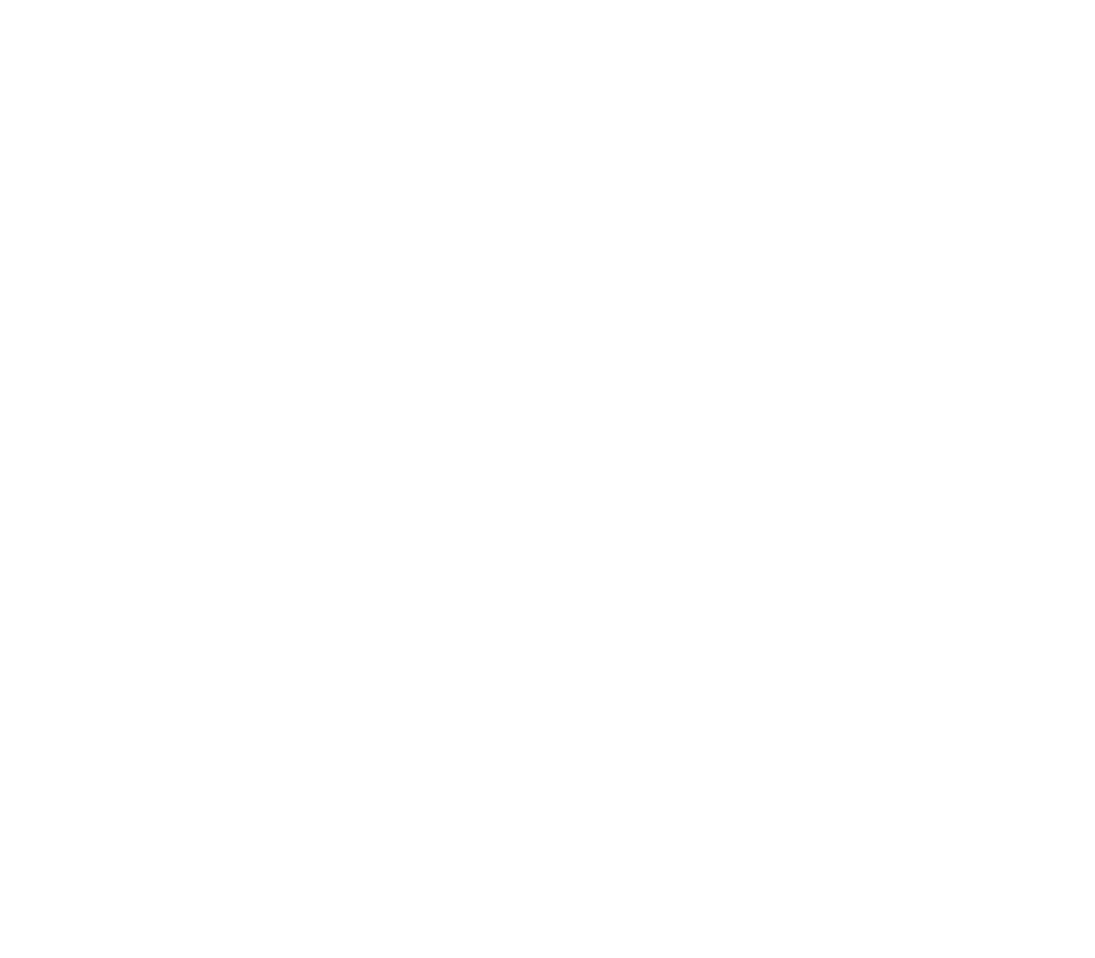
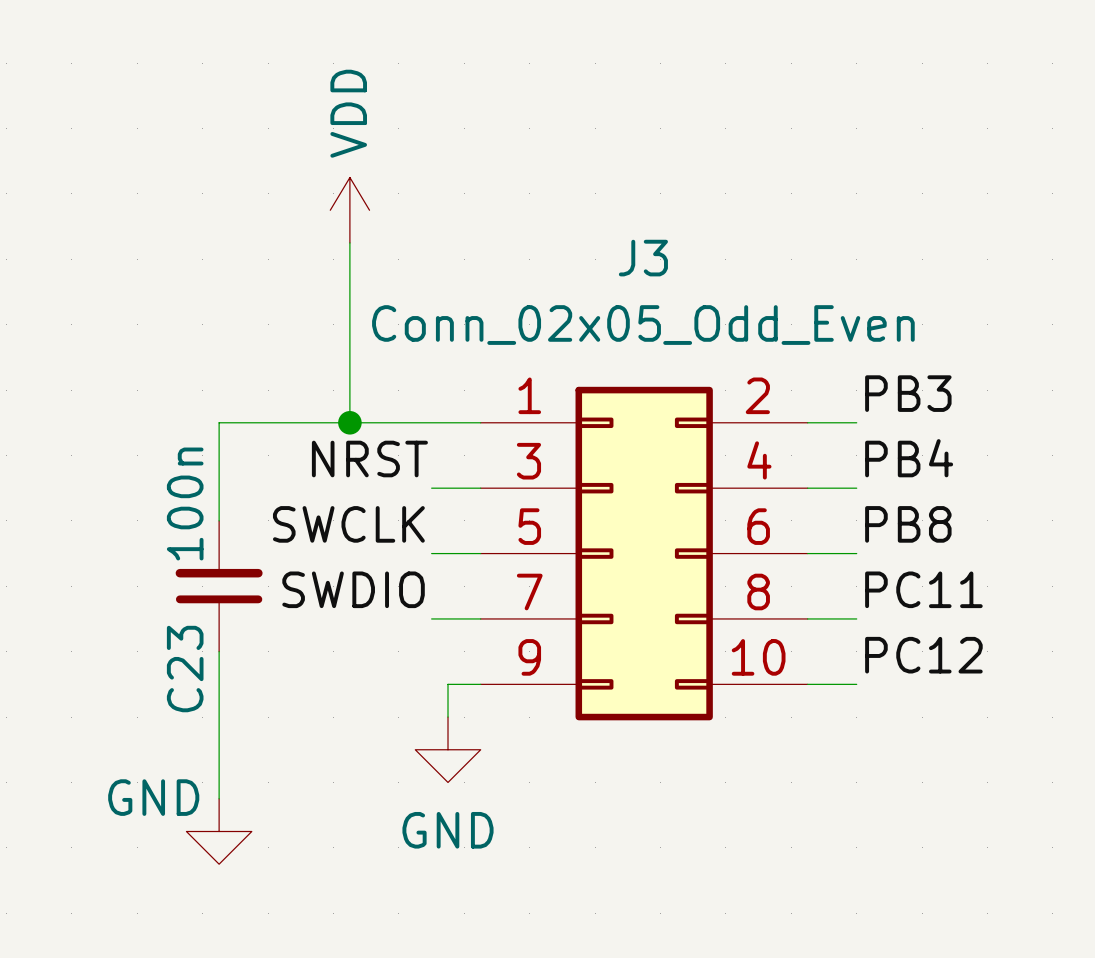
power symbol: none -> VDD (349, 210)
wire: none -> (349, 242) (349, 422)
label: none -> PB3 (908, 393)
junction: none -> (349, 422)
wire: none -> (480, 422) (219, 422) (219, 520)
wire: none -> (807, 422) (856, 422)
label: none -> NRST (369, 459)
label: none -> PB4 (909, 458)
wire: none -> (431, 488) (480, 488)
wire: none -> (807, 488) (856, 488)
label: none -> SWCLK (348, 524)
label: none -> PB8 (908, 524)
wire: none -> (431, 553) (480, 553)
J3: none -> Conn_02x05_Odd_Even (644, 553)
wire: none -> (807, 553) (856, 553)
C23: none -> 100n (219, 586)
label: none -> SWDIO (353, 589)
label: none -> PC11 (923, 589)
wire: none -> (431, 618) (480, 618)
wire: none -> (807, 618) (856, 618)
wire: none -> (219, 651) (219, 798)
label: none -> PC12 (923, 655)
wire: none -> (480, 684) (448, 684) (448, 717)
wire: none -> (807, 684) (856, 684)
power symbol: none -> GND (448, 749)
power symbol: none -> GND (219, 831)

